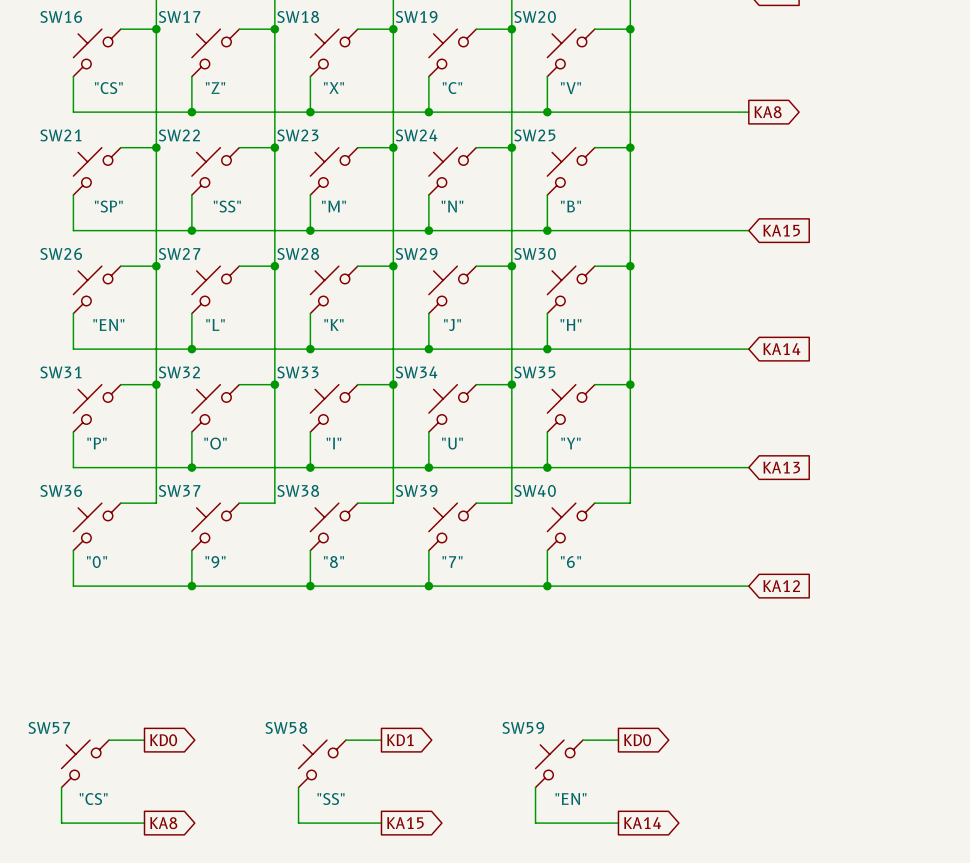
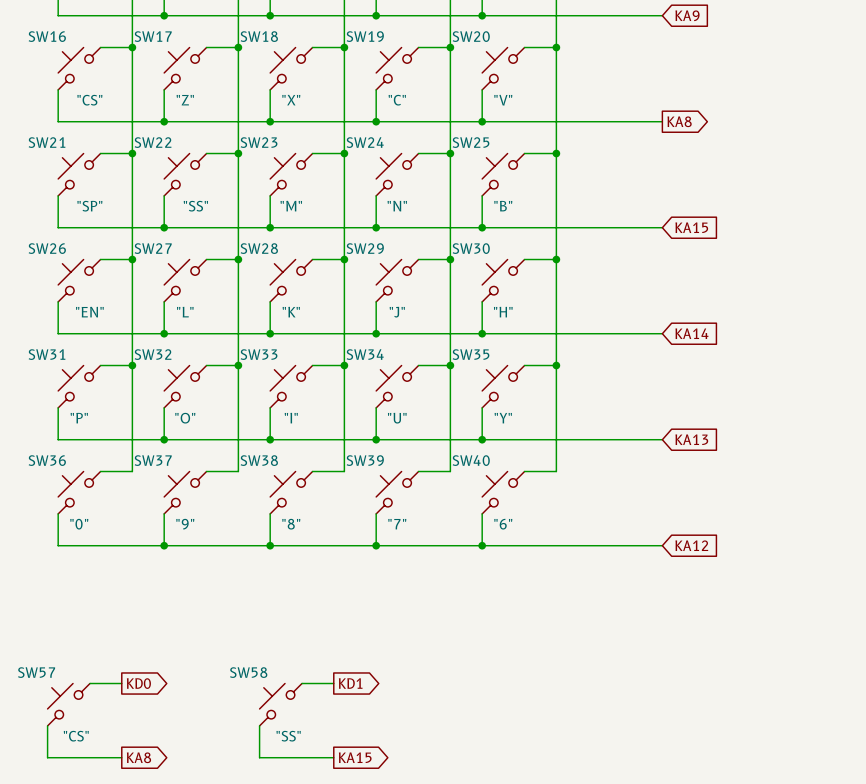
wire: (582, 740) (618, 740) -> none
global label: KD0 (637, 740) -> none
SW59: (559, 763) -> none
wire: (535, 787) (535, 823) (618, 823) -> none
global label: KA14 (642, 823) -> none

